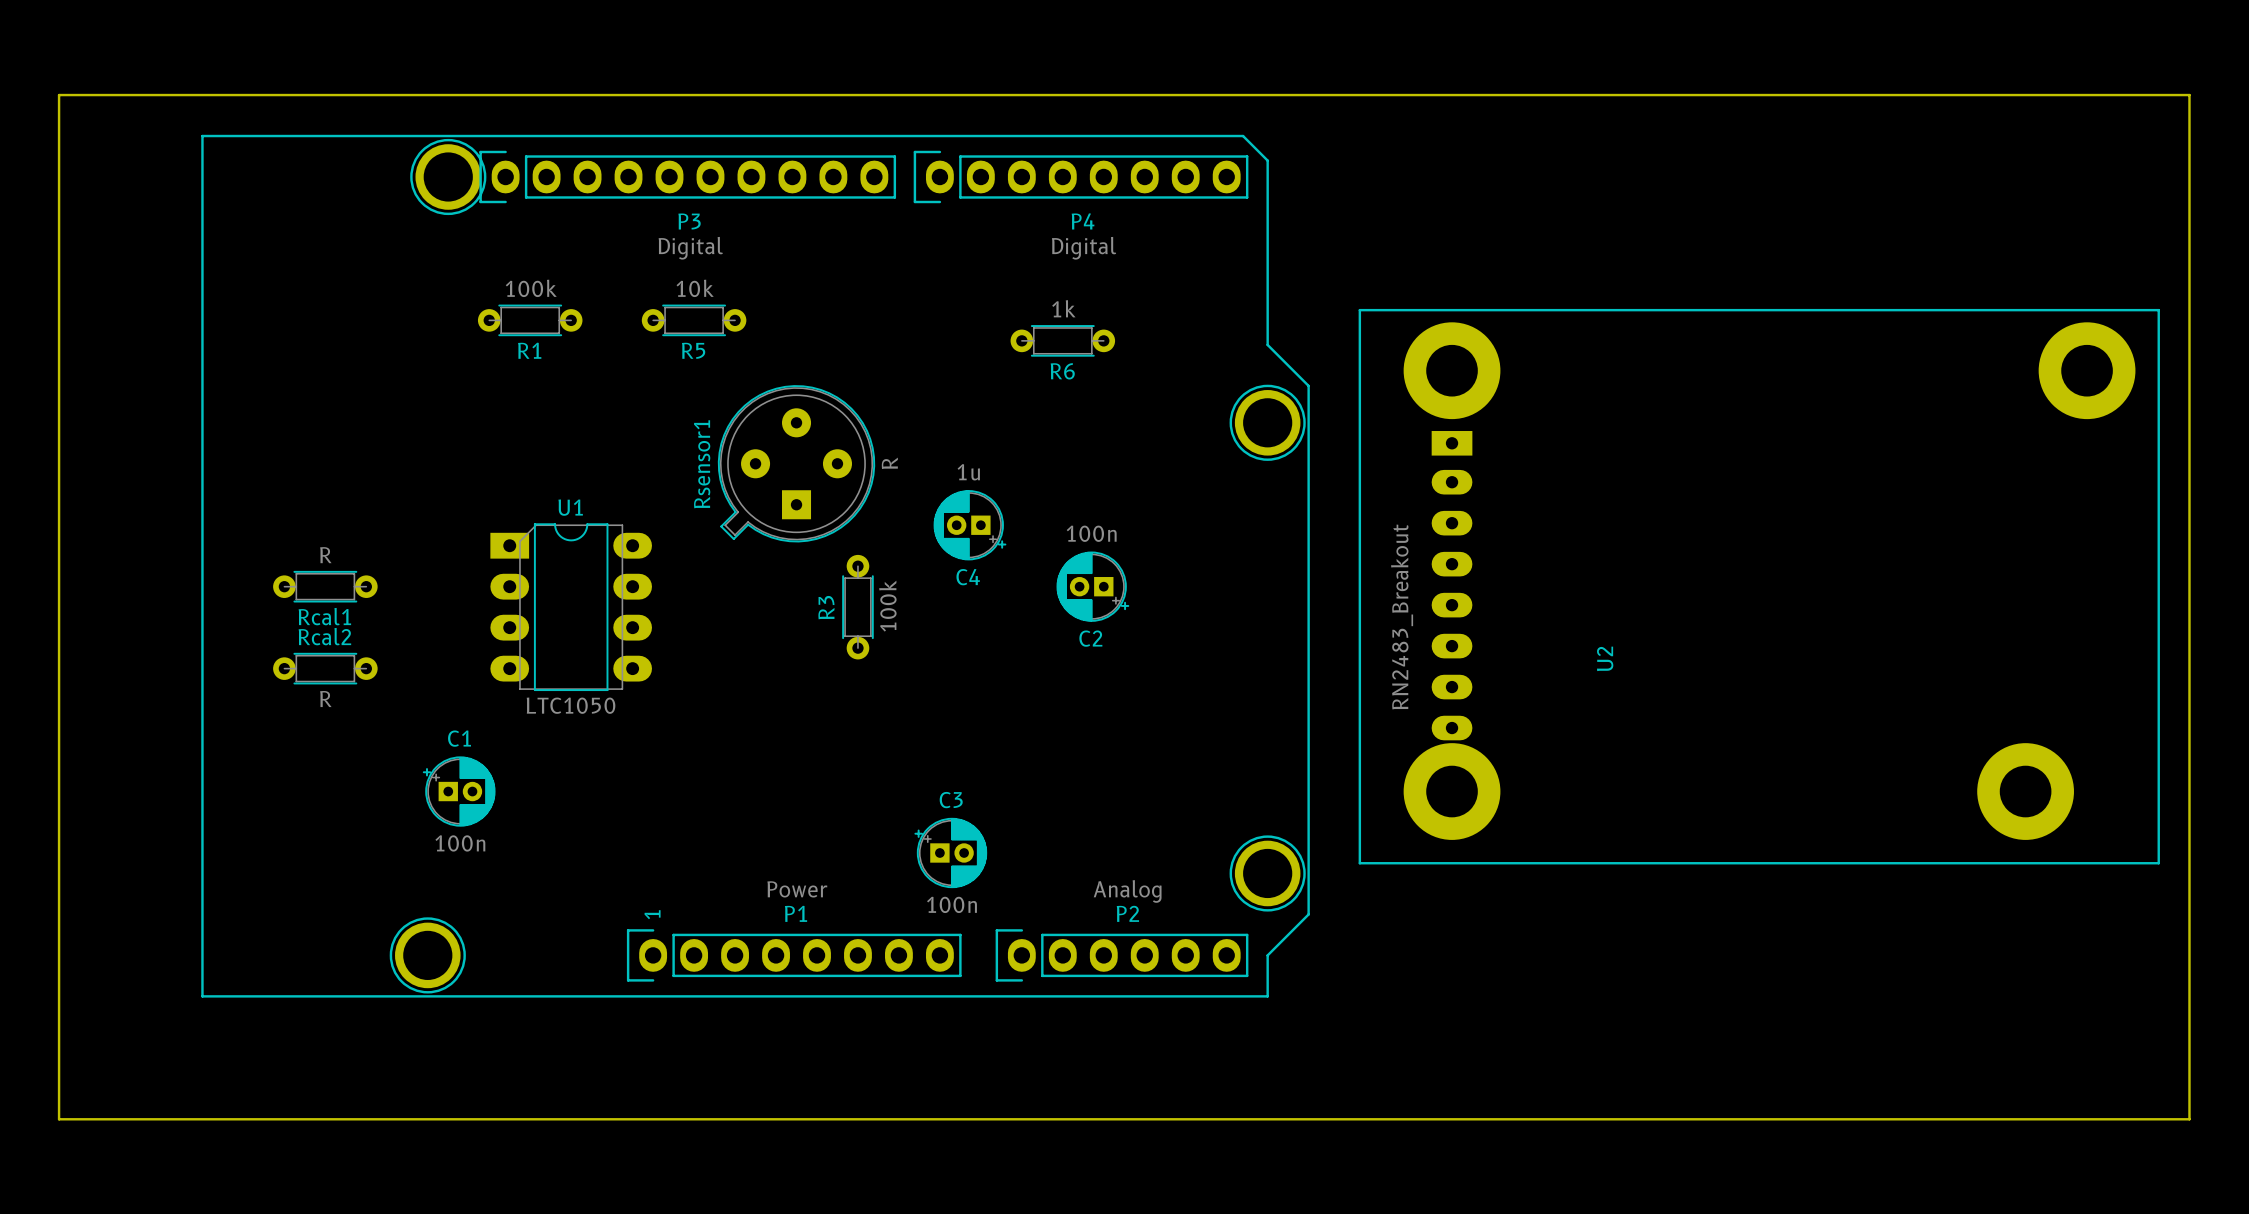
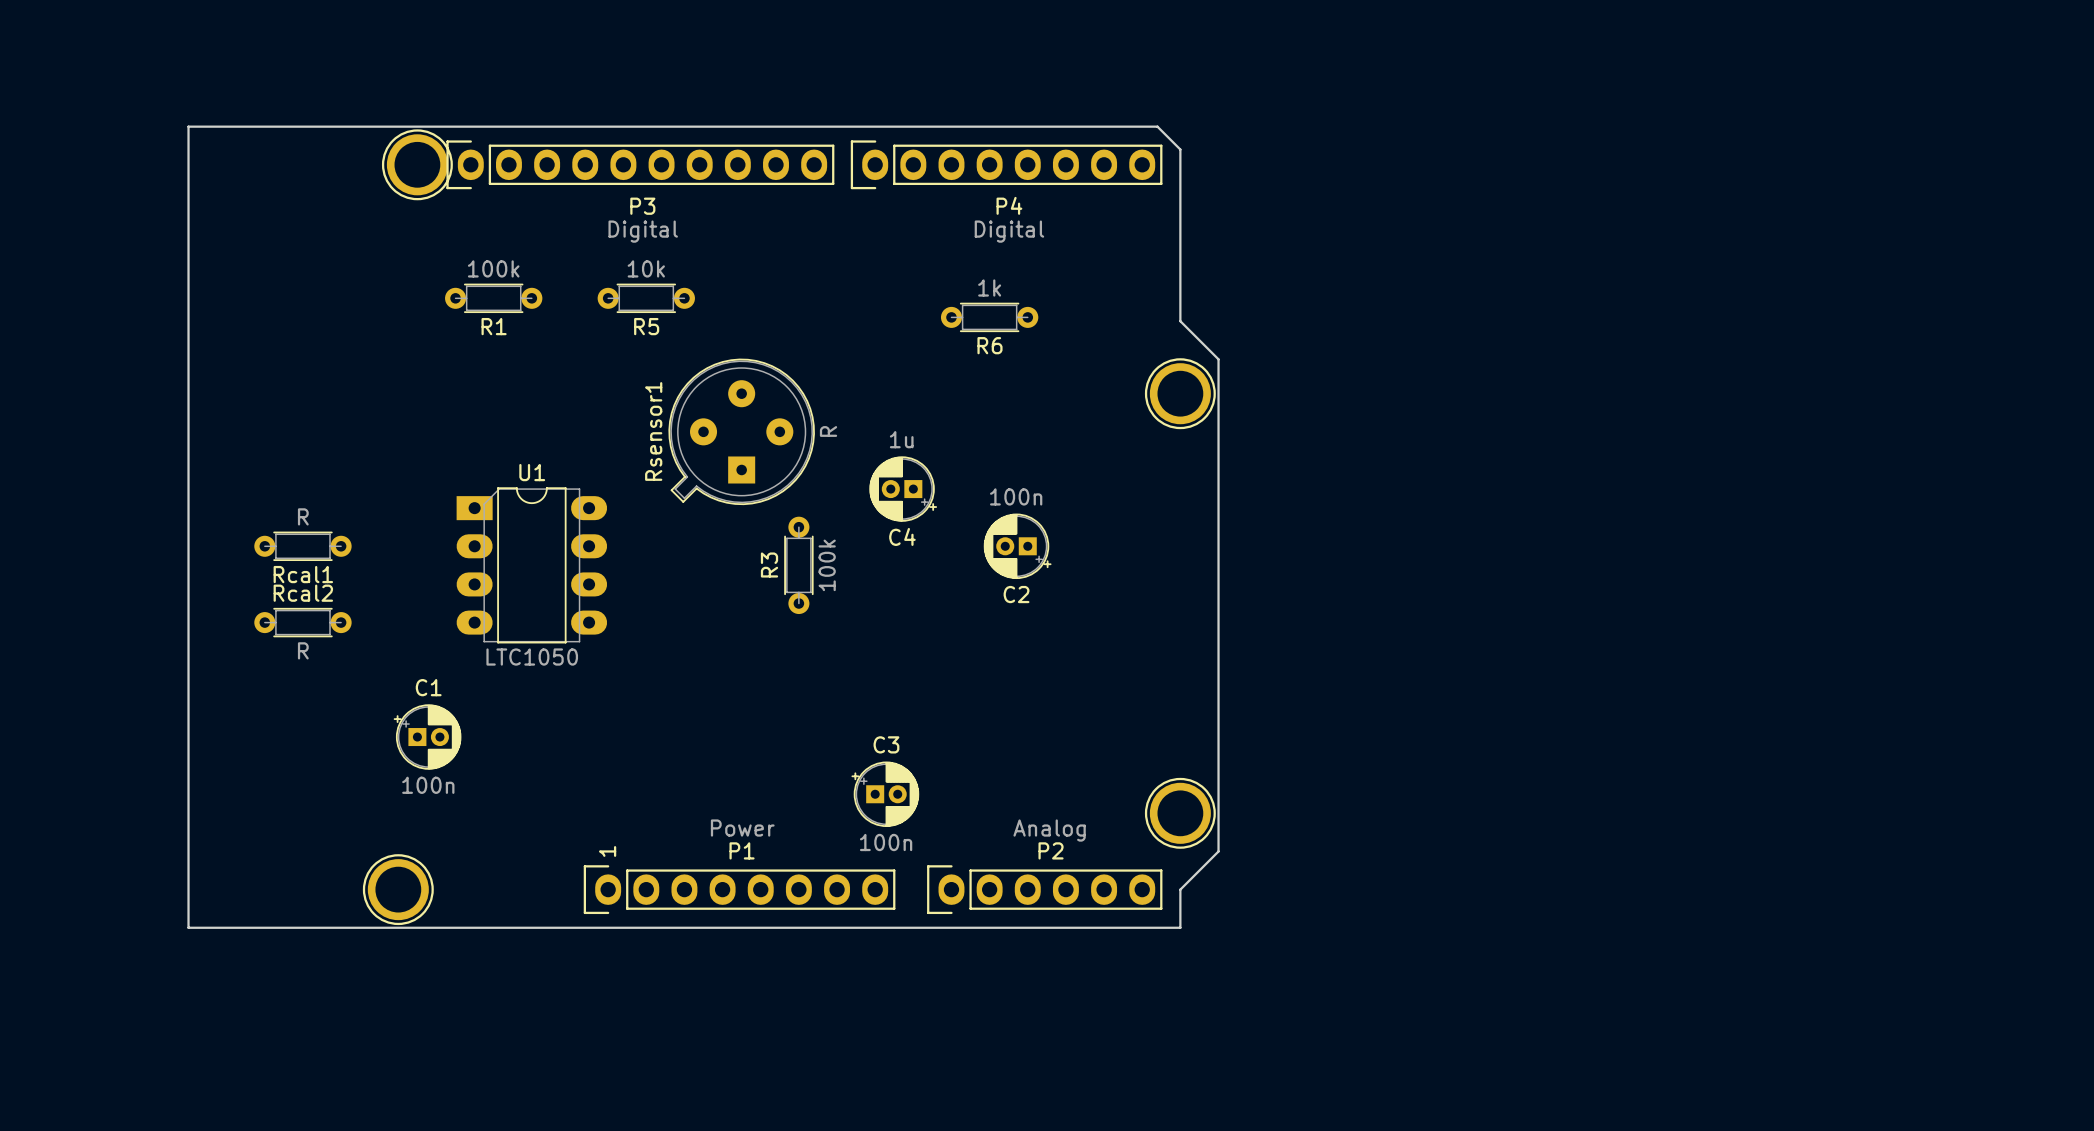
board edge: (59, 95) (59, 1119) (2189, 1119) (2189, 95) (59, 95) -> none
board edge: none -> (188, 126) (188, 927) (1180, 927) (1180, 889) (1218, 851) (1218, 359) (1180, 321) (1180, 149) (1157, 126) (188, 126)
line: (202, 136) (202, 996) (1267, 996) (1267, 955) (1308, 914) (1308, 385) (1267, 344) (1267, 160) (1243, 136) (202, 136) -> none
U2: RN2483_Breakout (1759, 586) -> none

